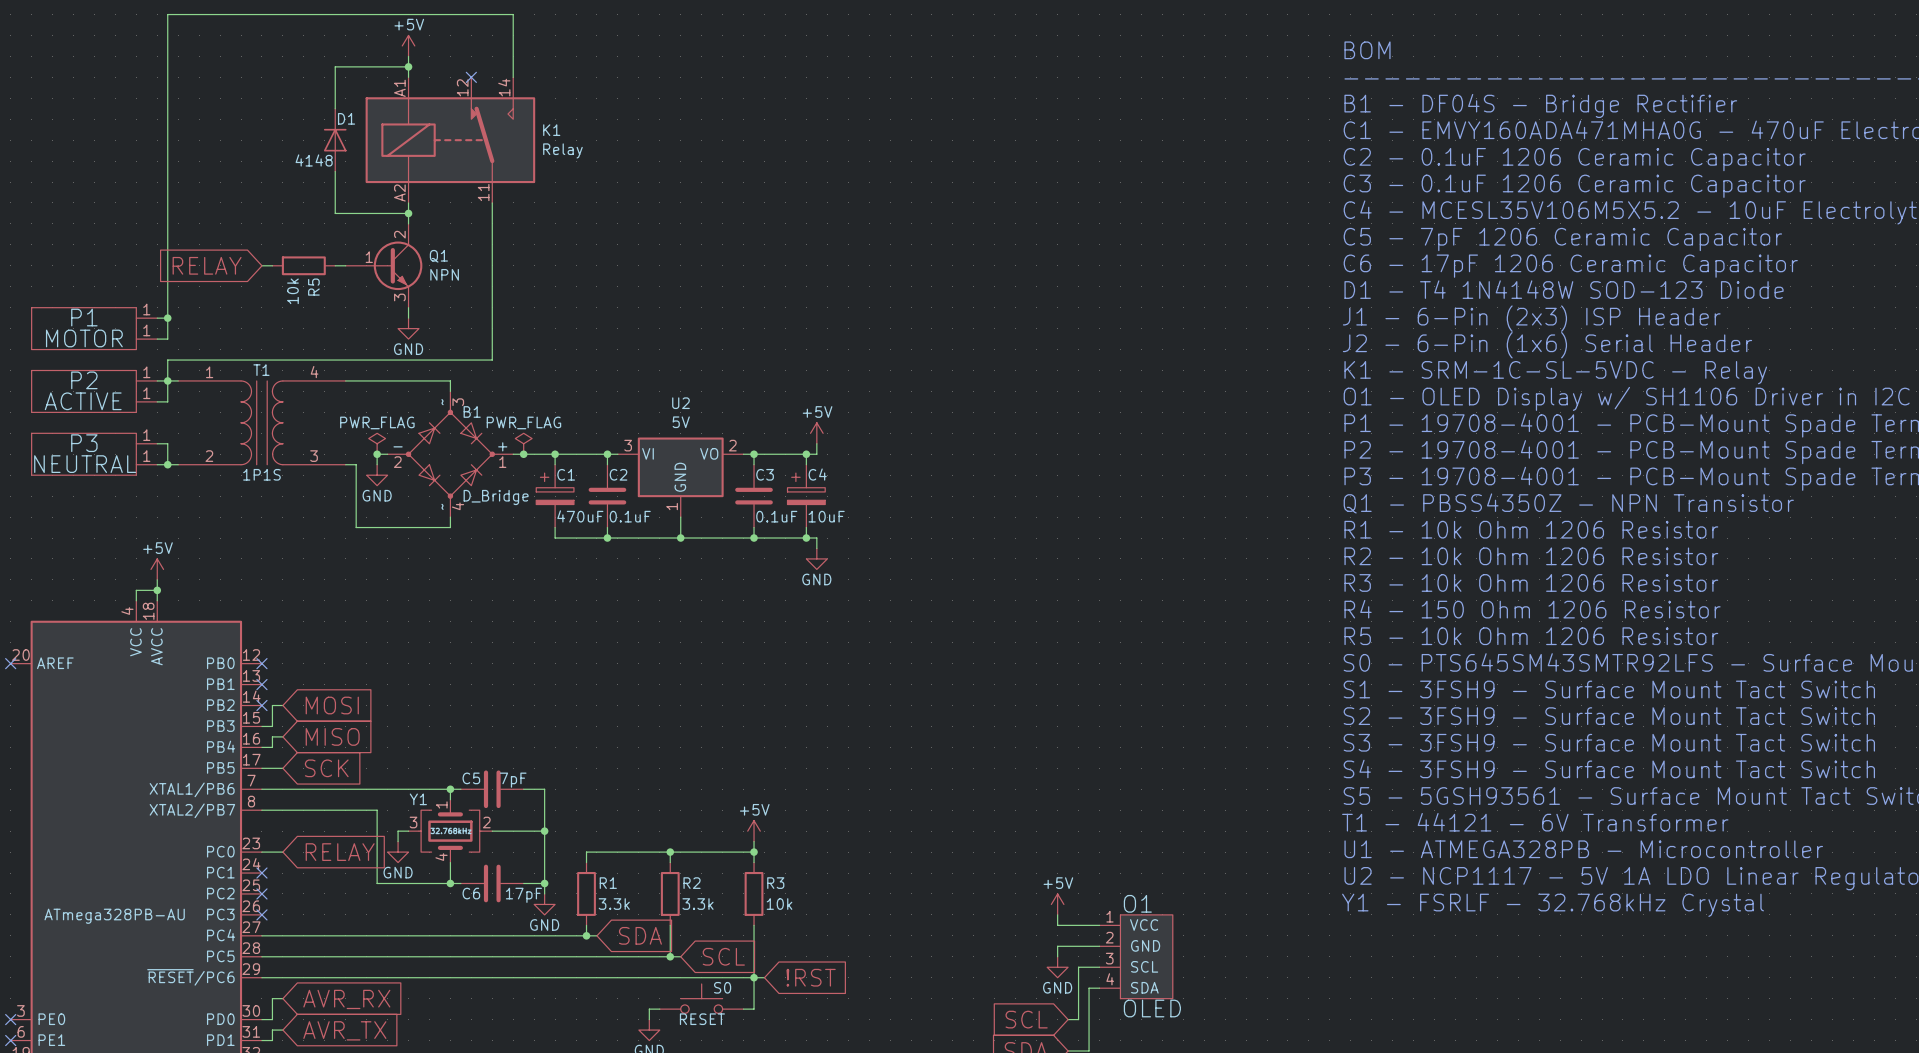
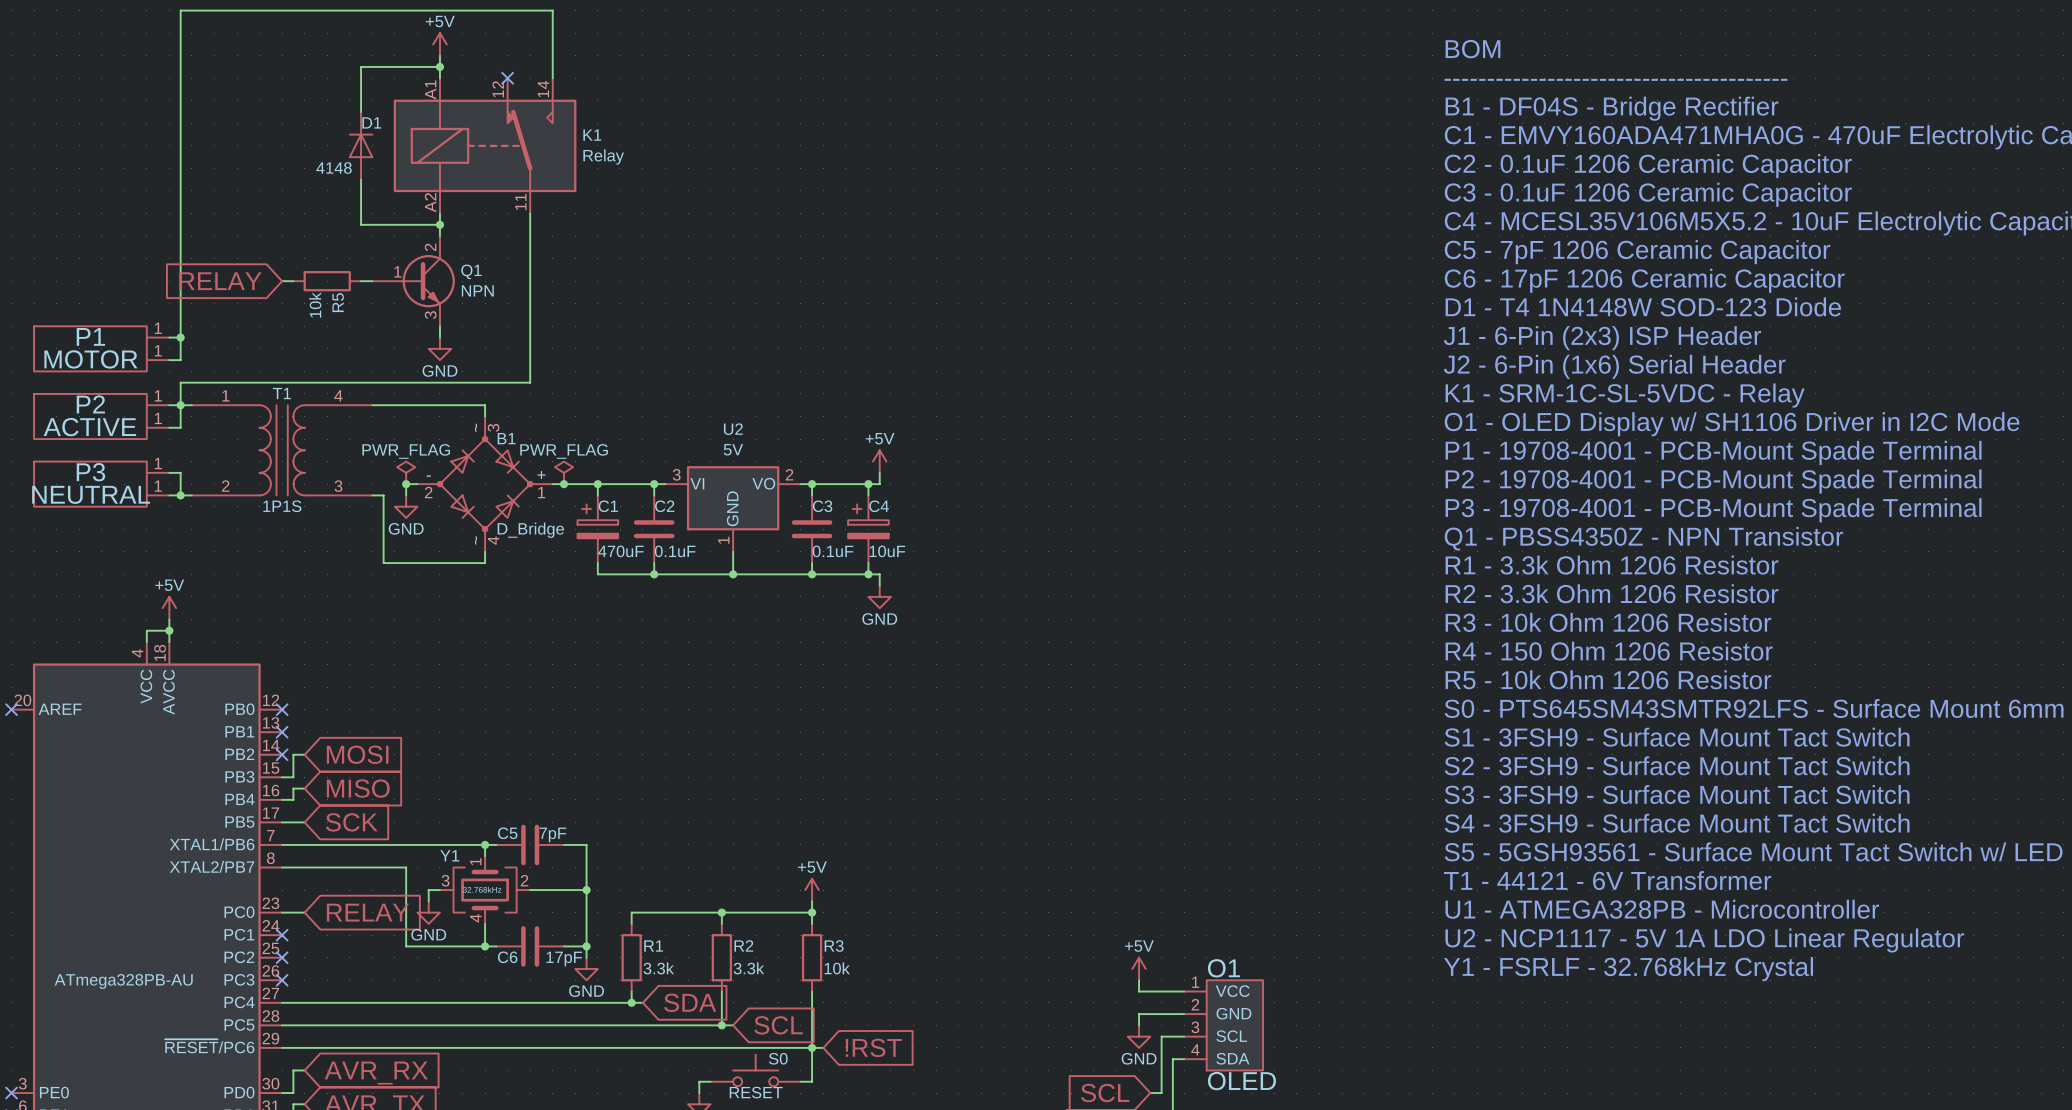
text: R1 - 10k Ohm 1206 Resistor (1531, 529) -> R1 - 3.3k Ohm 1206 Resistor (1612, 565)
text: R2 - 10k Ohm 1206 Resistor (1531, 556) -> R2 - 3.3k Ohm 1206 Resistor (1612, 593)

